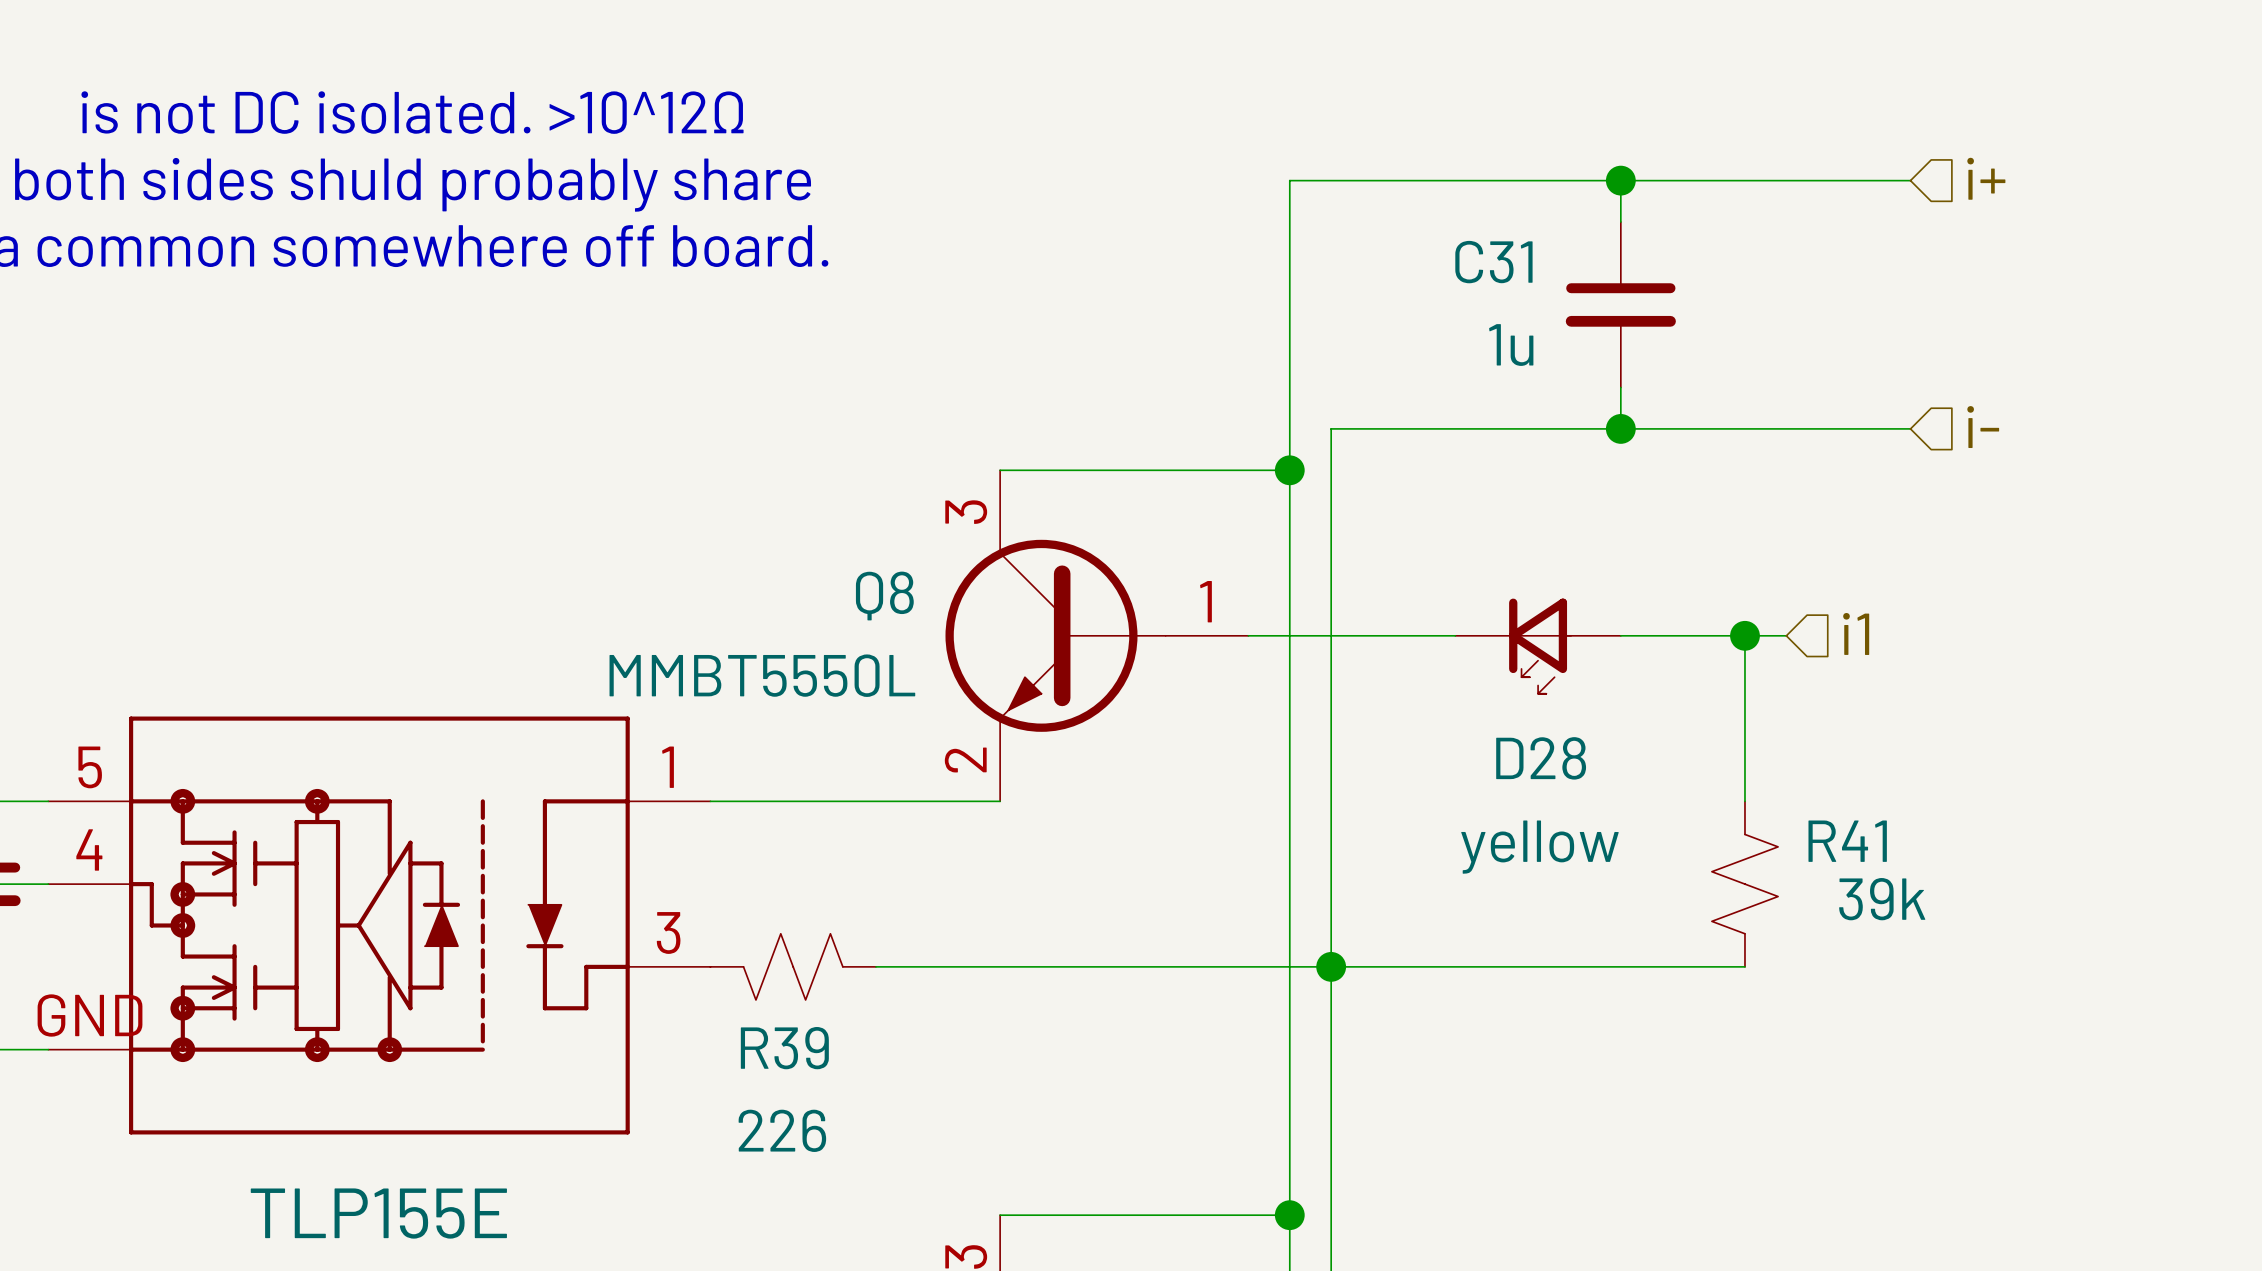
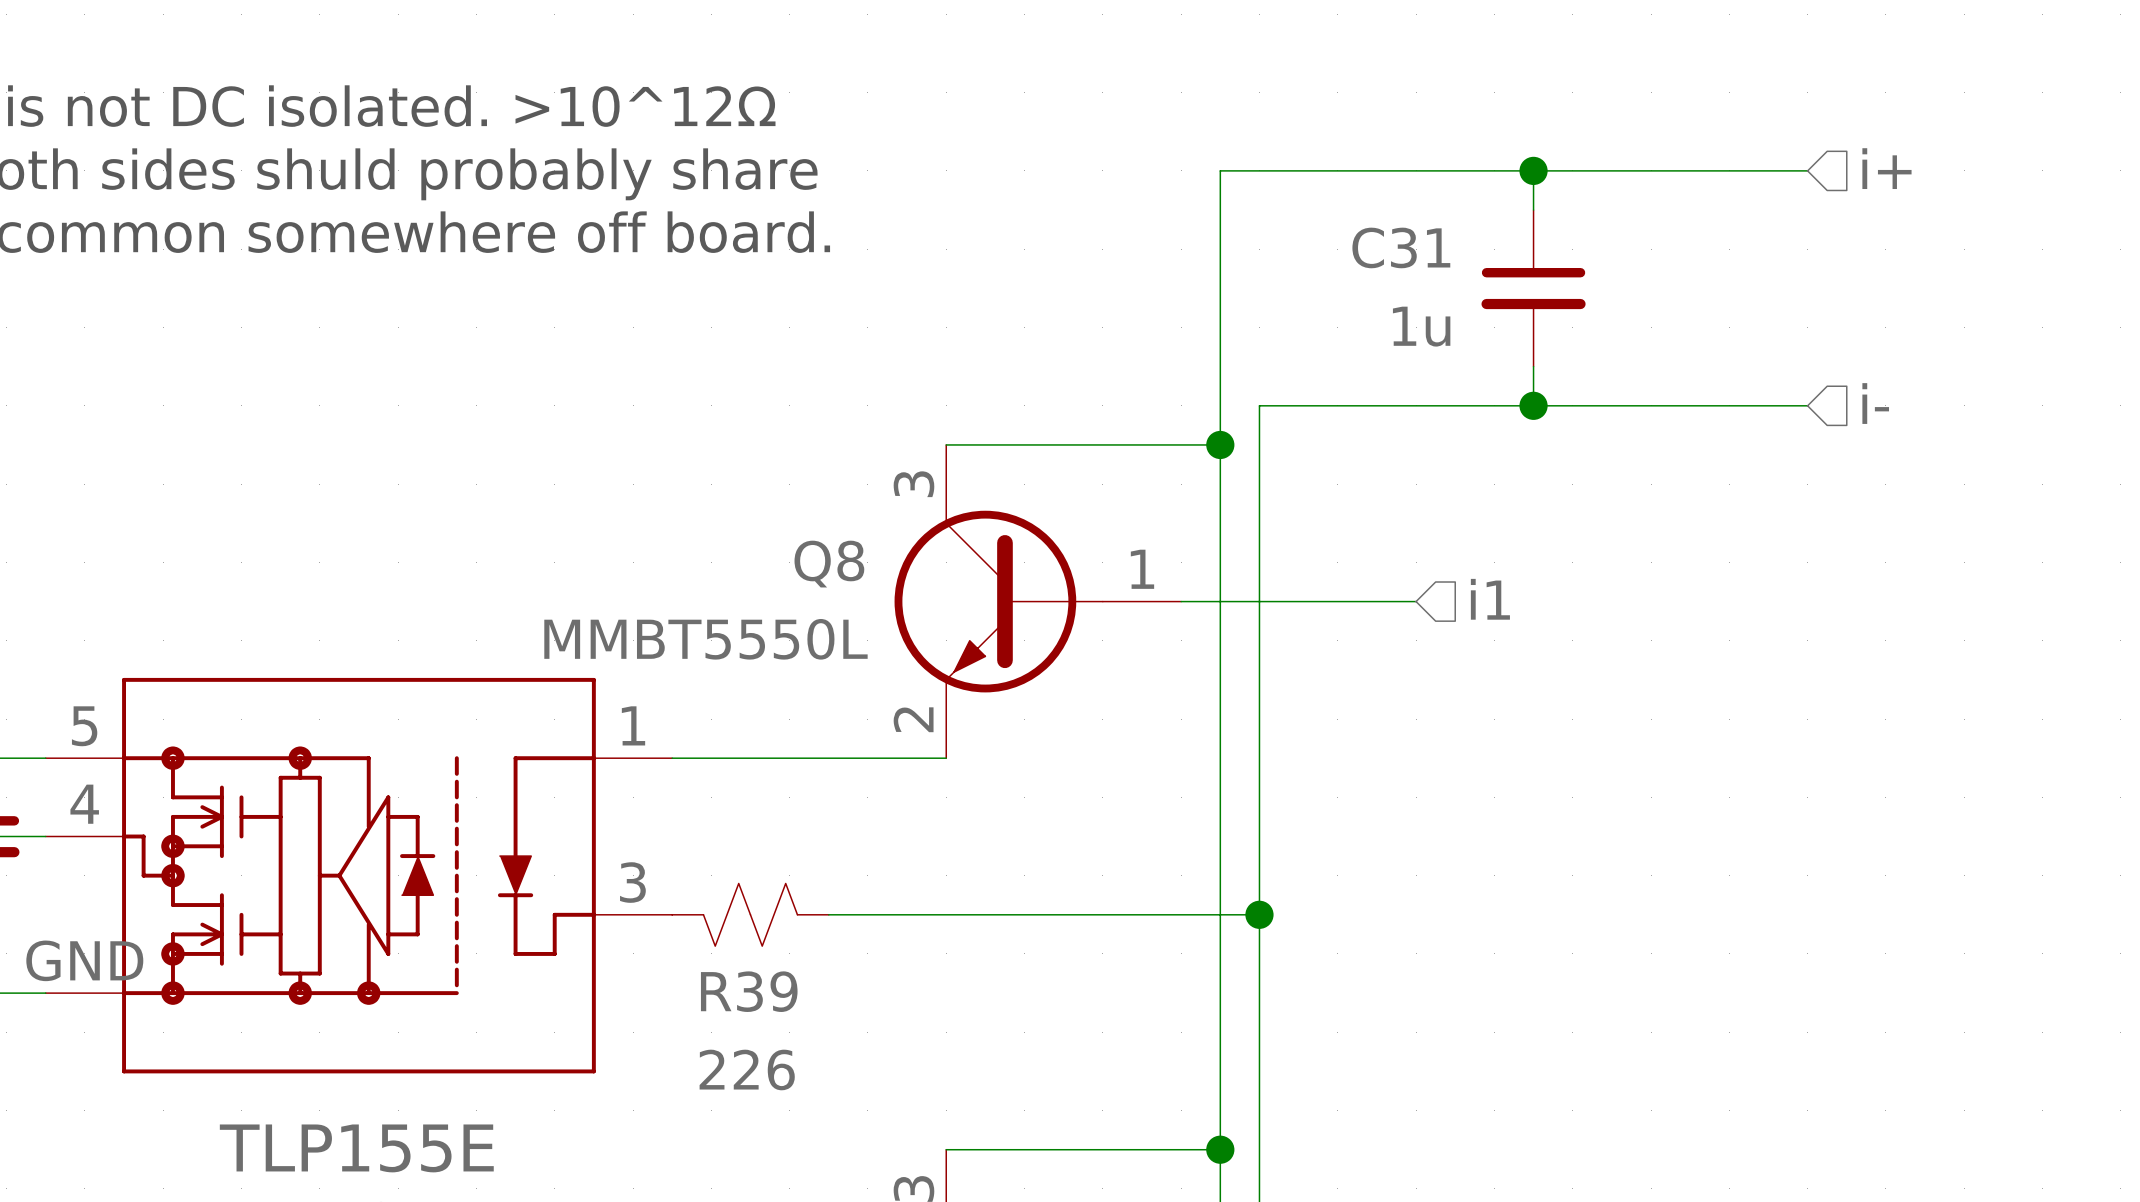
hierarchical label position: i1 (1856, 633) -> i1 (1490, 599)
wire: (1620, 635) (1786, 635) -> none
wire: (1744, 635) (1744, 801) -> none
junction: (1744, 635) -> none
D28: yellow (1538, 646) -> none
R41: 39k (1744, 884) -> none
wire: (1331, 966) (1744, 966) -> none

